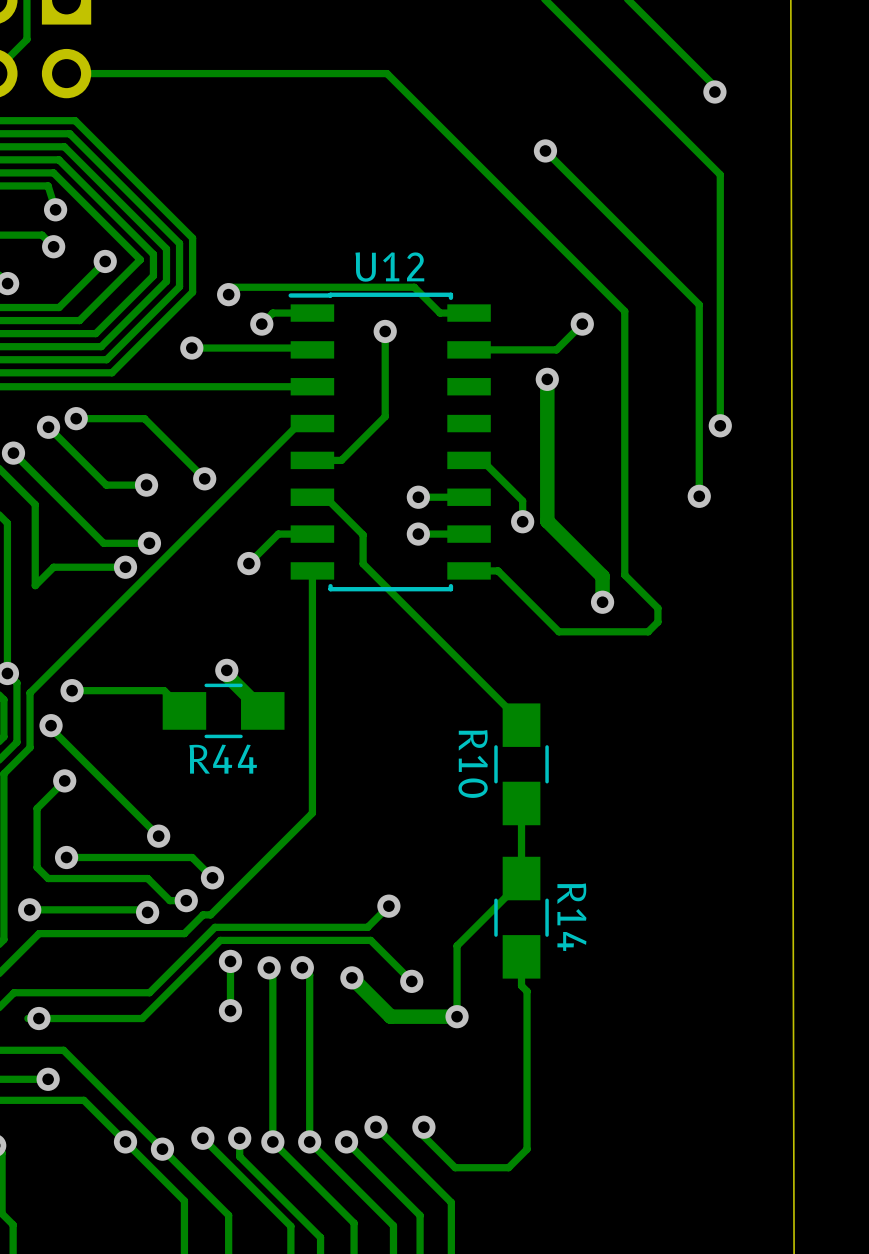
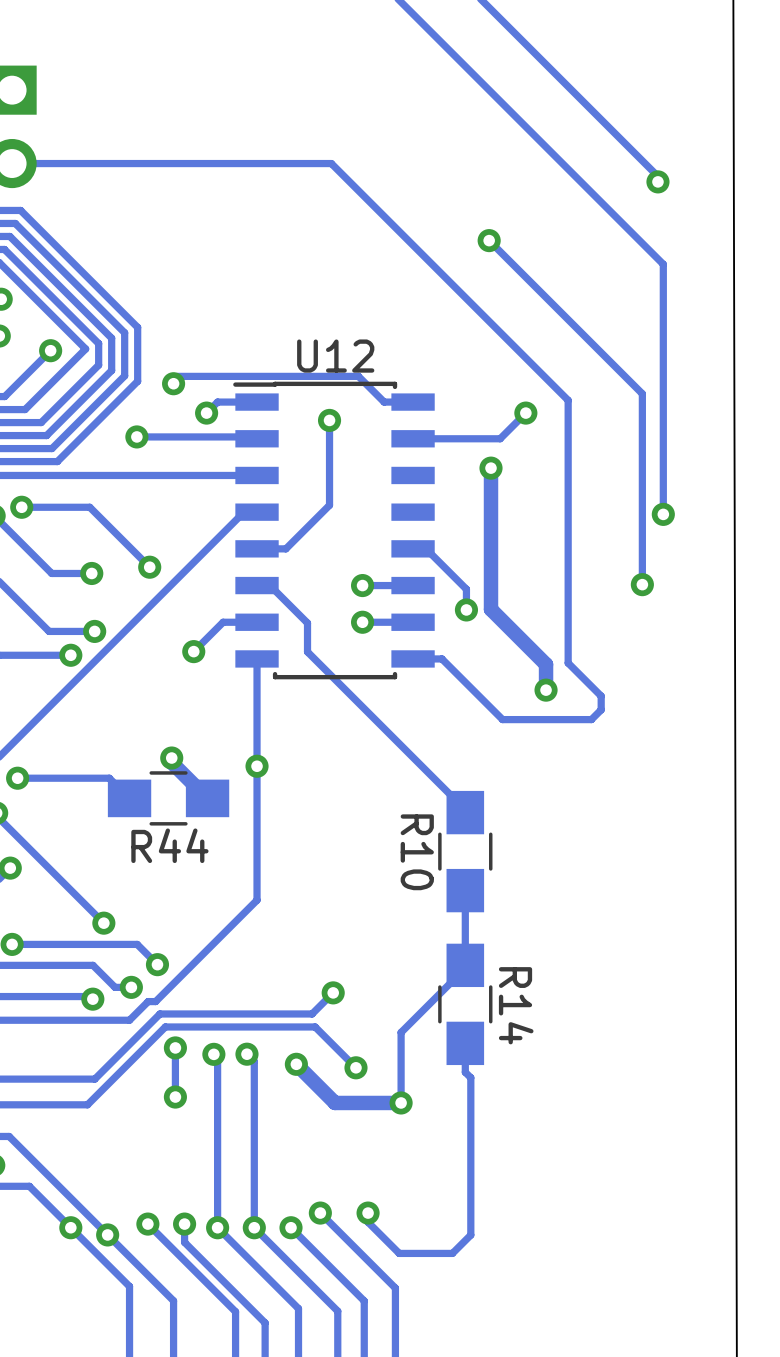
via: none -> (257, 766)

